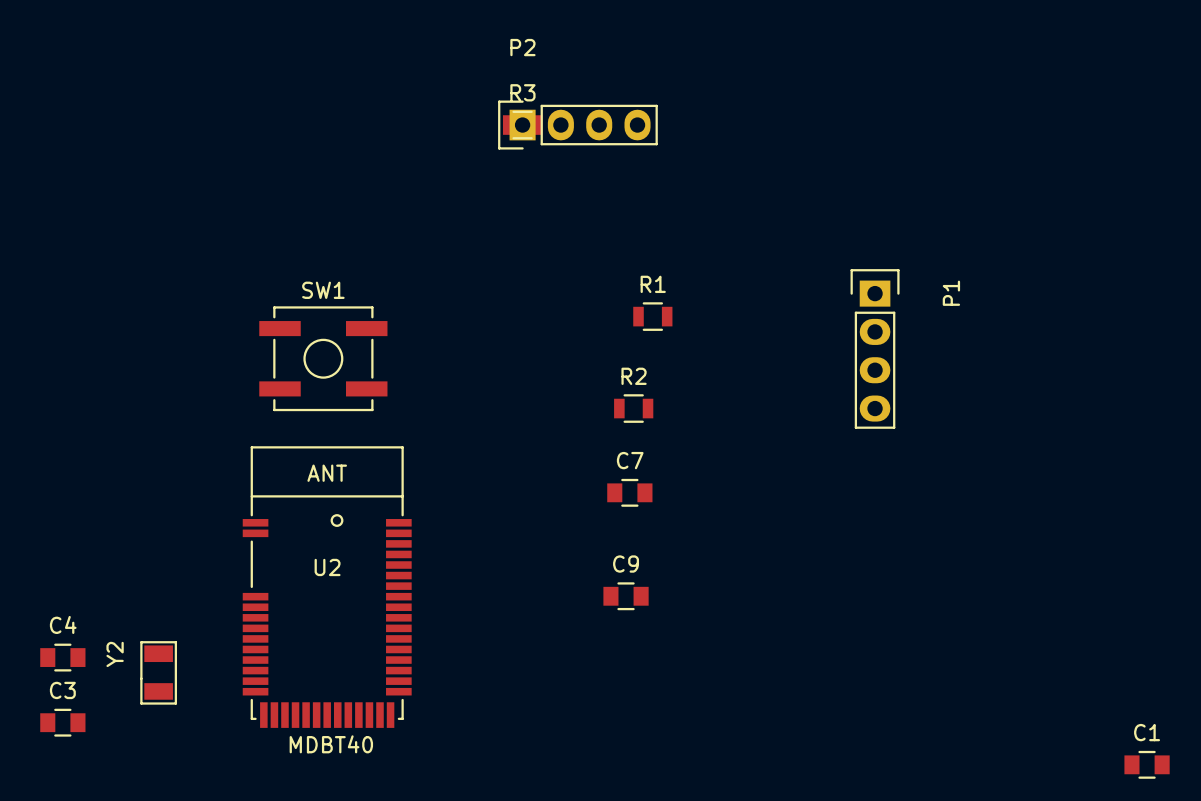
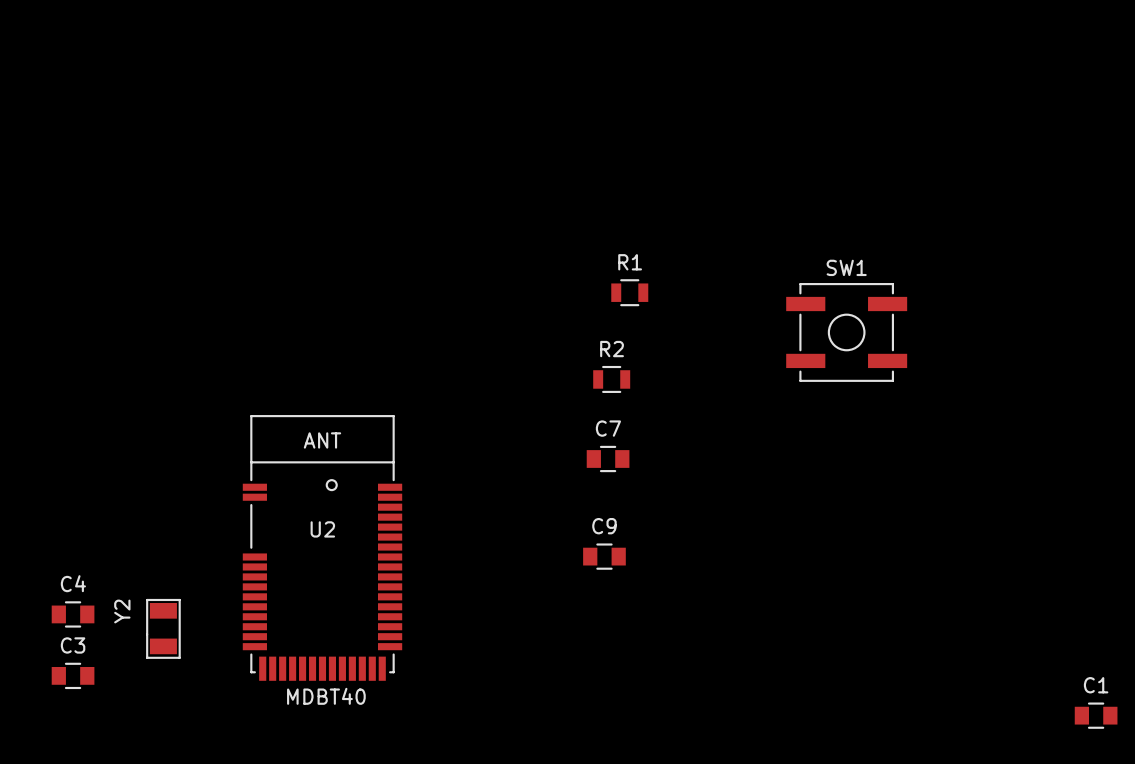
R3: (522, 125) -> none
P2: (577, 125) -> none
P1: (875, 348) -> none
SW1 position: (323, 358) -> (846, 332)

